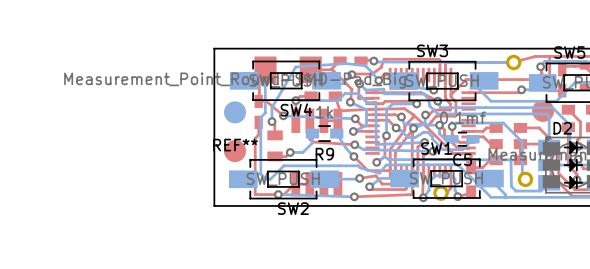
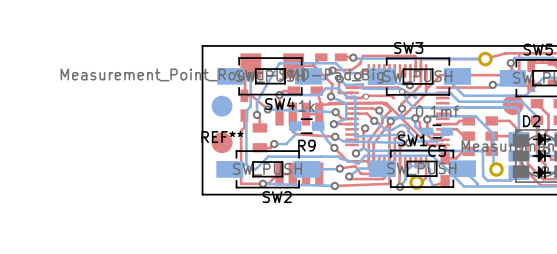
bottom track: (365, 65) (346, 63) (295, 67) -> (359, 74) (345, 73) (335, 63) (279, 63)
bottom track: (365, 65) (378, 80) -> none
top track: (445, 75) (445, 98) (450, 104) (450, 109) (433, 110) (428, 115) (425, 115) -> (420, 70) (420, 84) (401, 104) (401, 108)
top track: (451, 96) (455, 101) (455, 116) (436, 116) (426, 127) (413, 114) -> (426, 91) (403, 116) (403, 120) (386, 103) (328, 103)
via: none -> (402, 91)
via: (437, 101) -> none
bottom track: (438, 101) (440, 107) (485, 107) -> (402, 91) (404, 93) (451, 93) (459, 101)
via: none -> (365, 96)
via: (416, 103) -> none
bottom track: (417, 104) (392, 103) (386, 109) (387, 135) -> none
via: (457, 196) -> none

